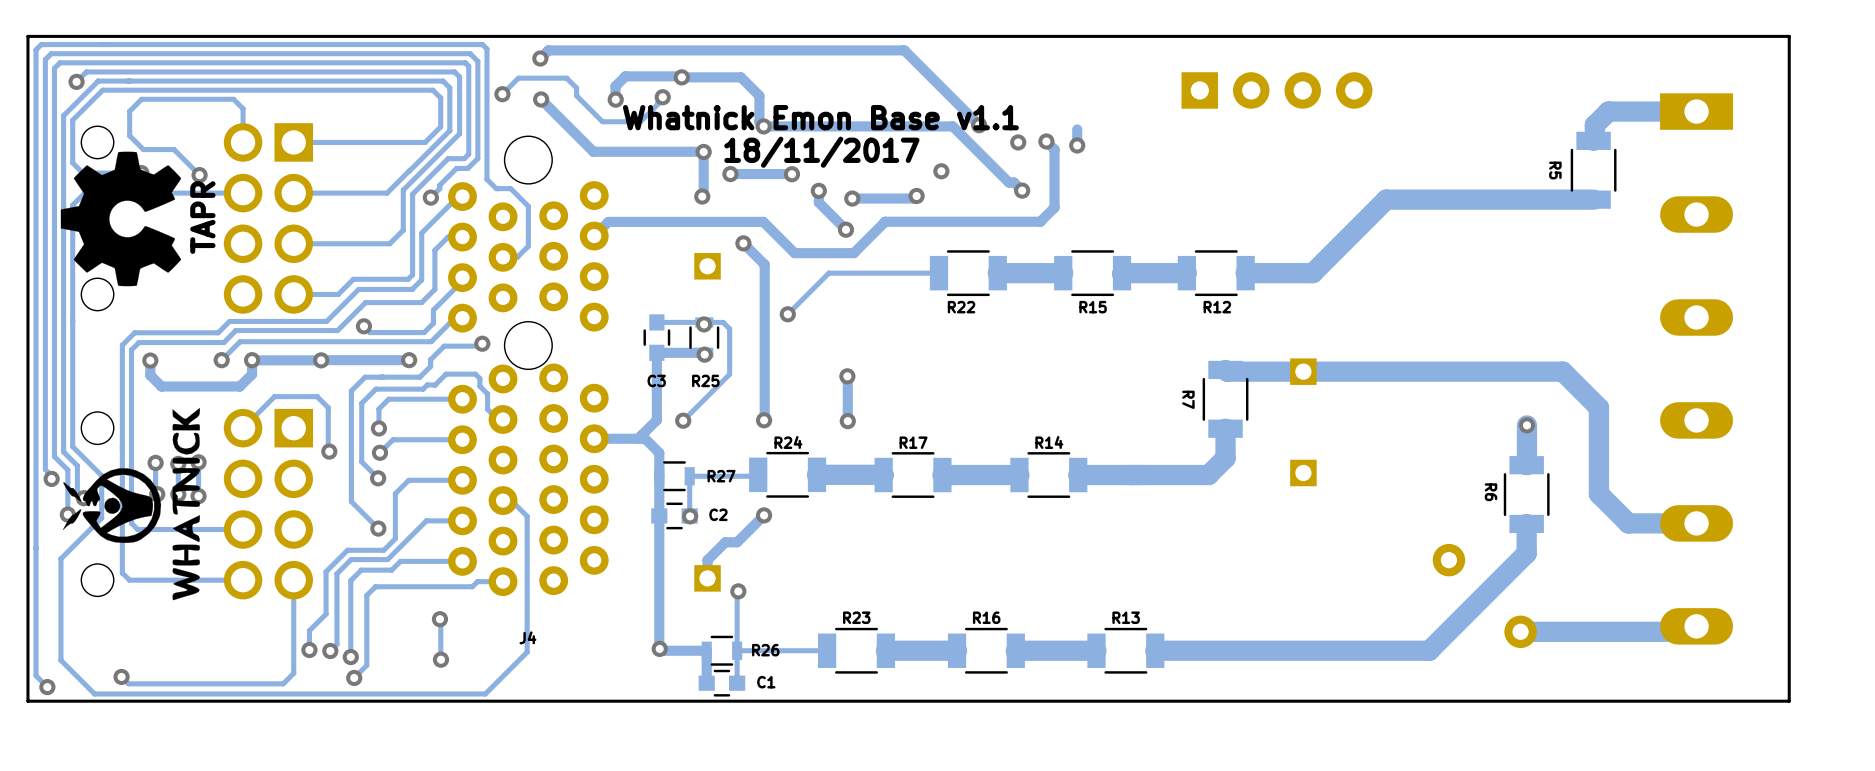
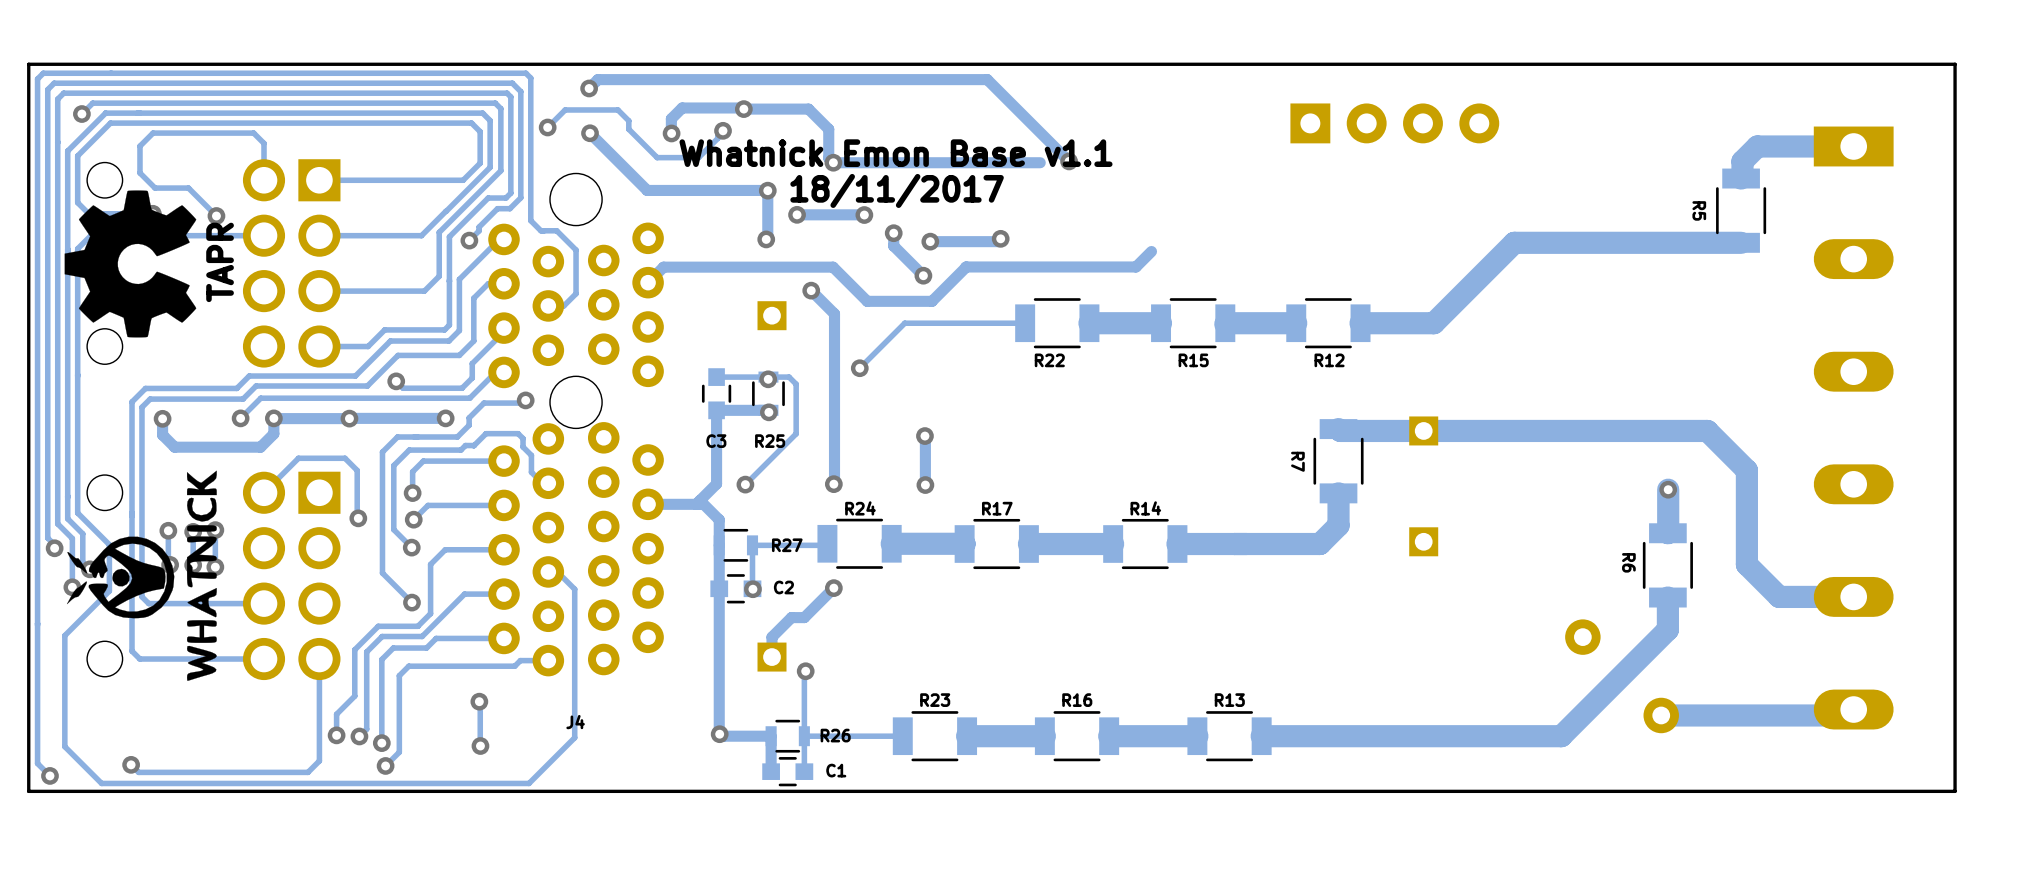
track: (952, 126) (1008, 182) (1014, 182) (1022, 190) -> none
track: (1077, 129) (1077, 145) -> none
track: (1046, 141) (1054, 149) (1054, 207) -> none
via: (1046, 141) -> none
via: (1018, 142) -> none
via: (1077, 145) -> none
via: (941, 171) -> none
via: (1022, 190) -> none

